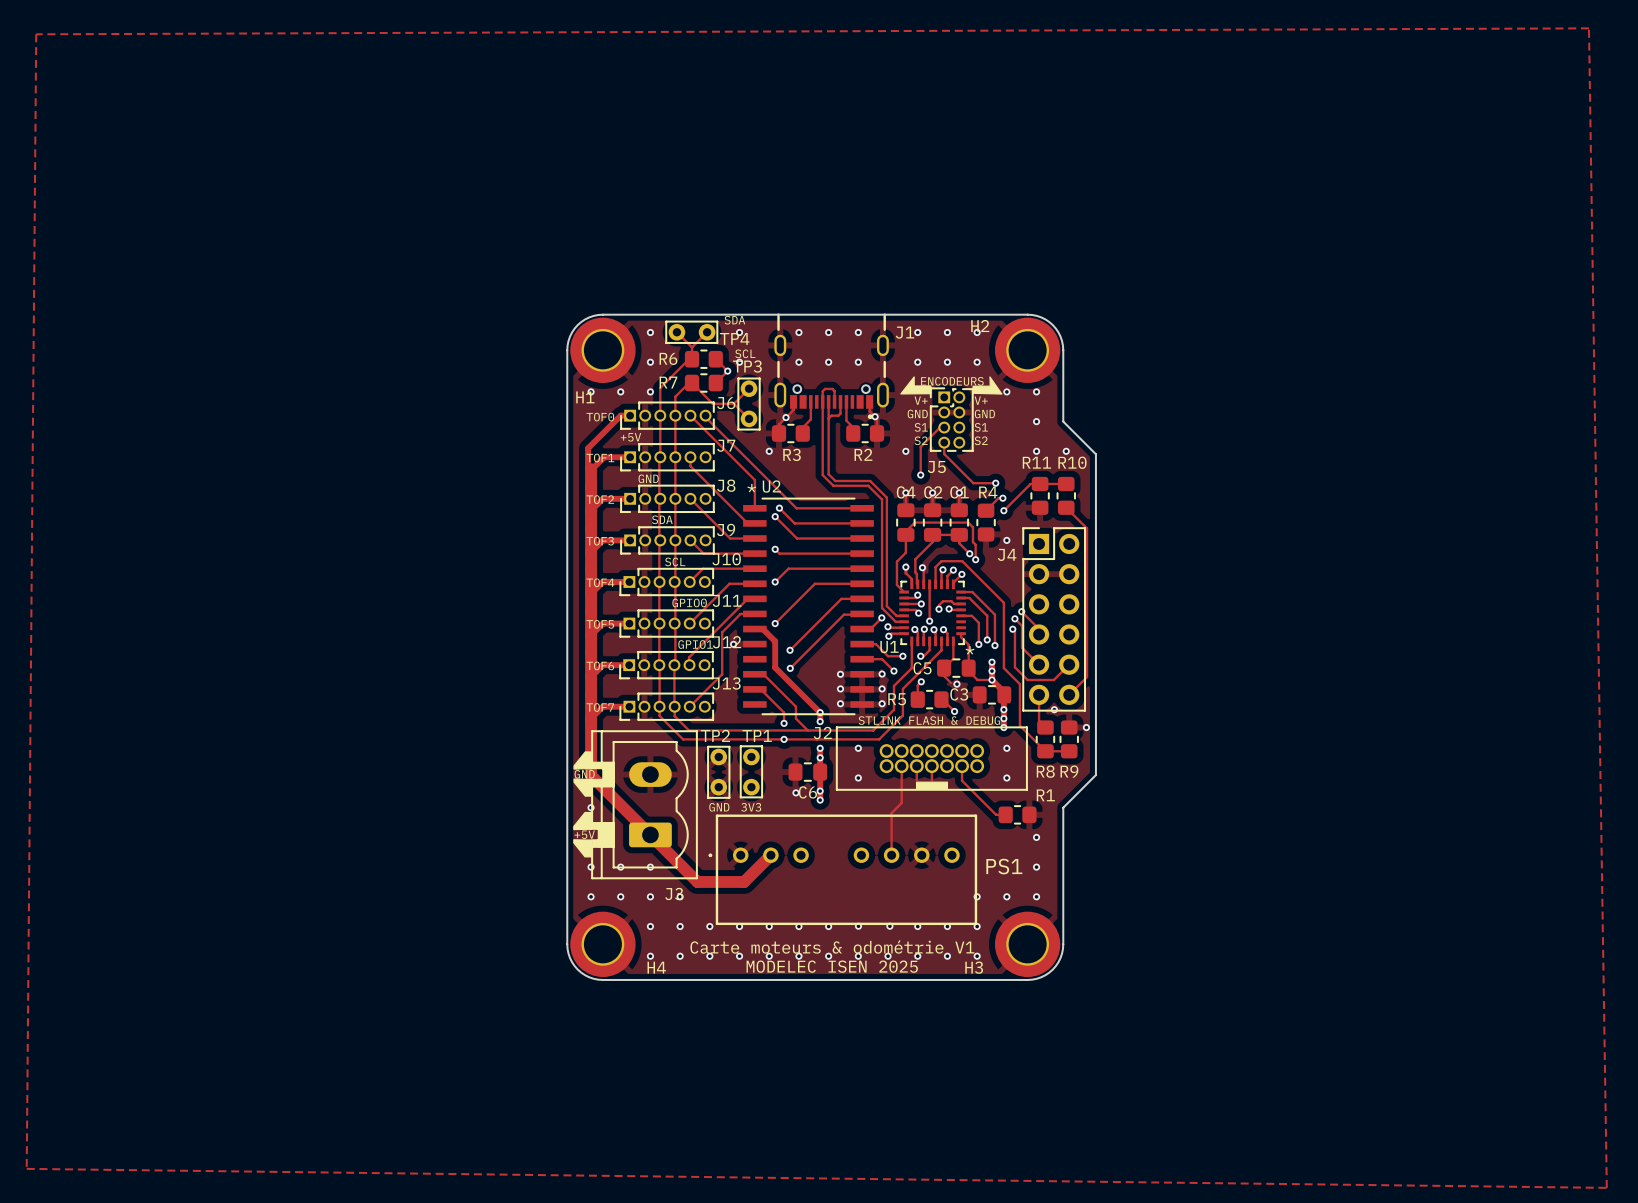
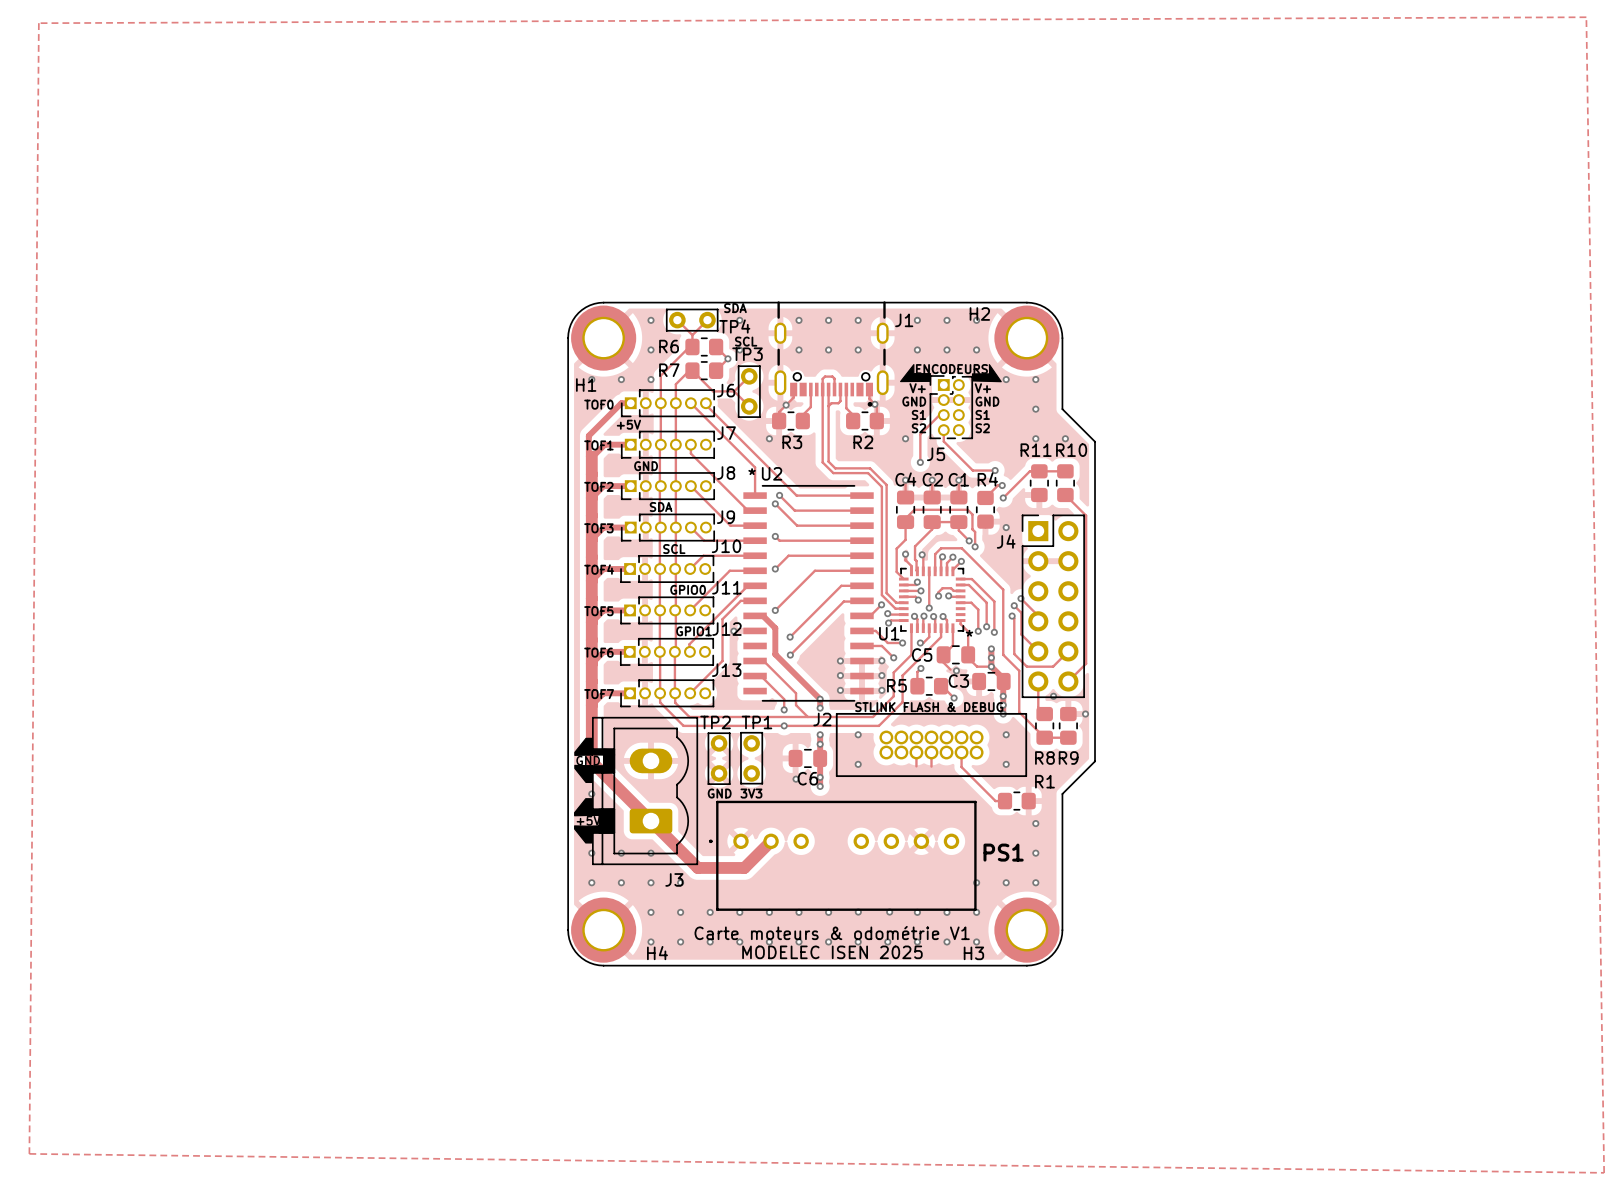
track: (901, 766) (901, 802) (891, 813) (891, 855) -> none
drawing: [915, 781, 949, 790] -> none

